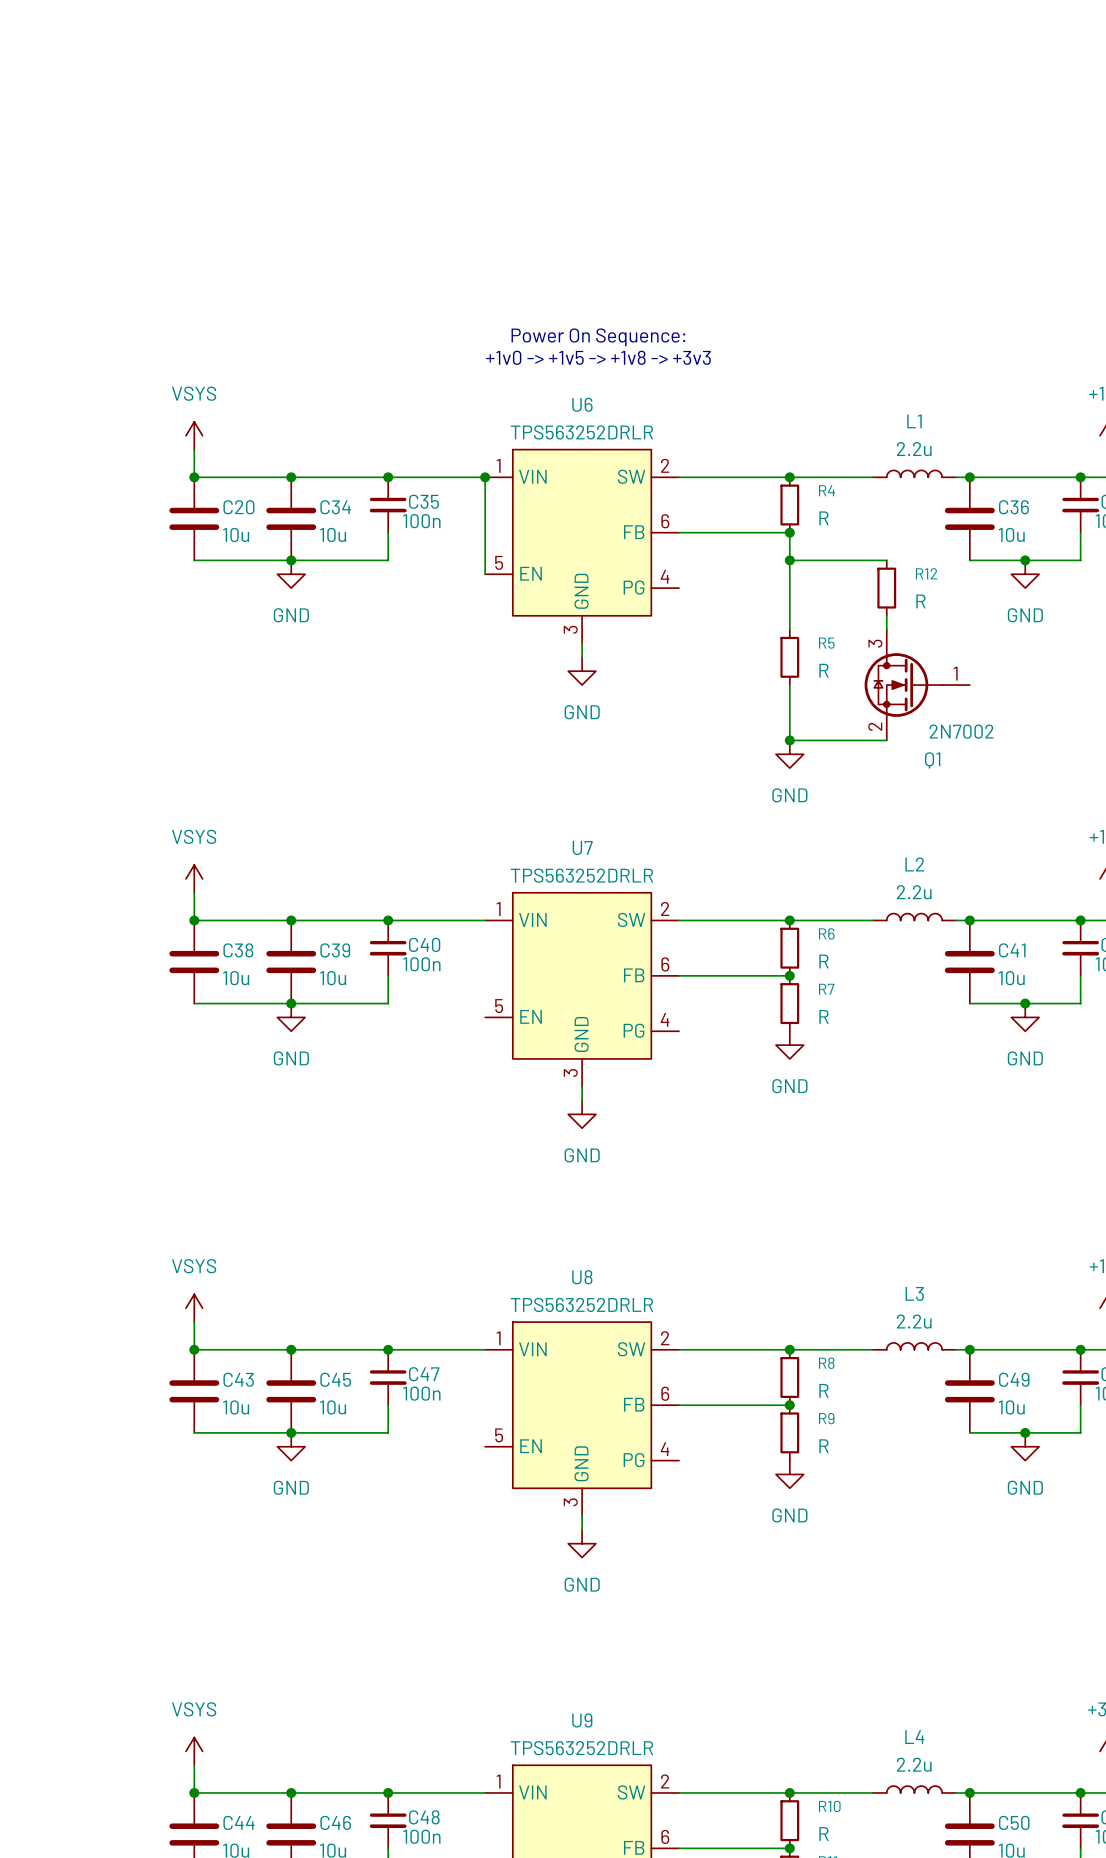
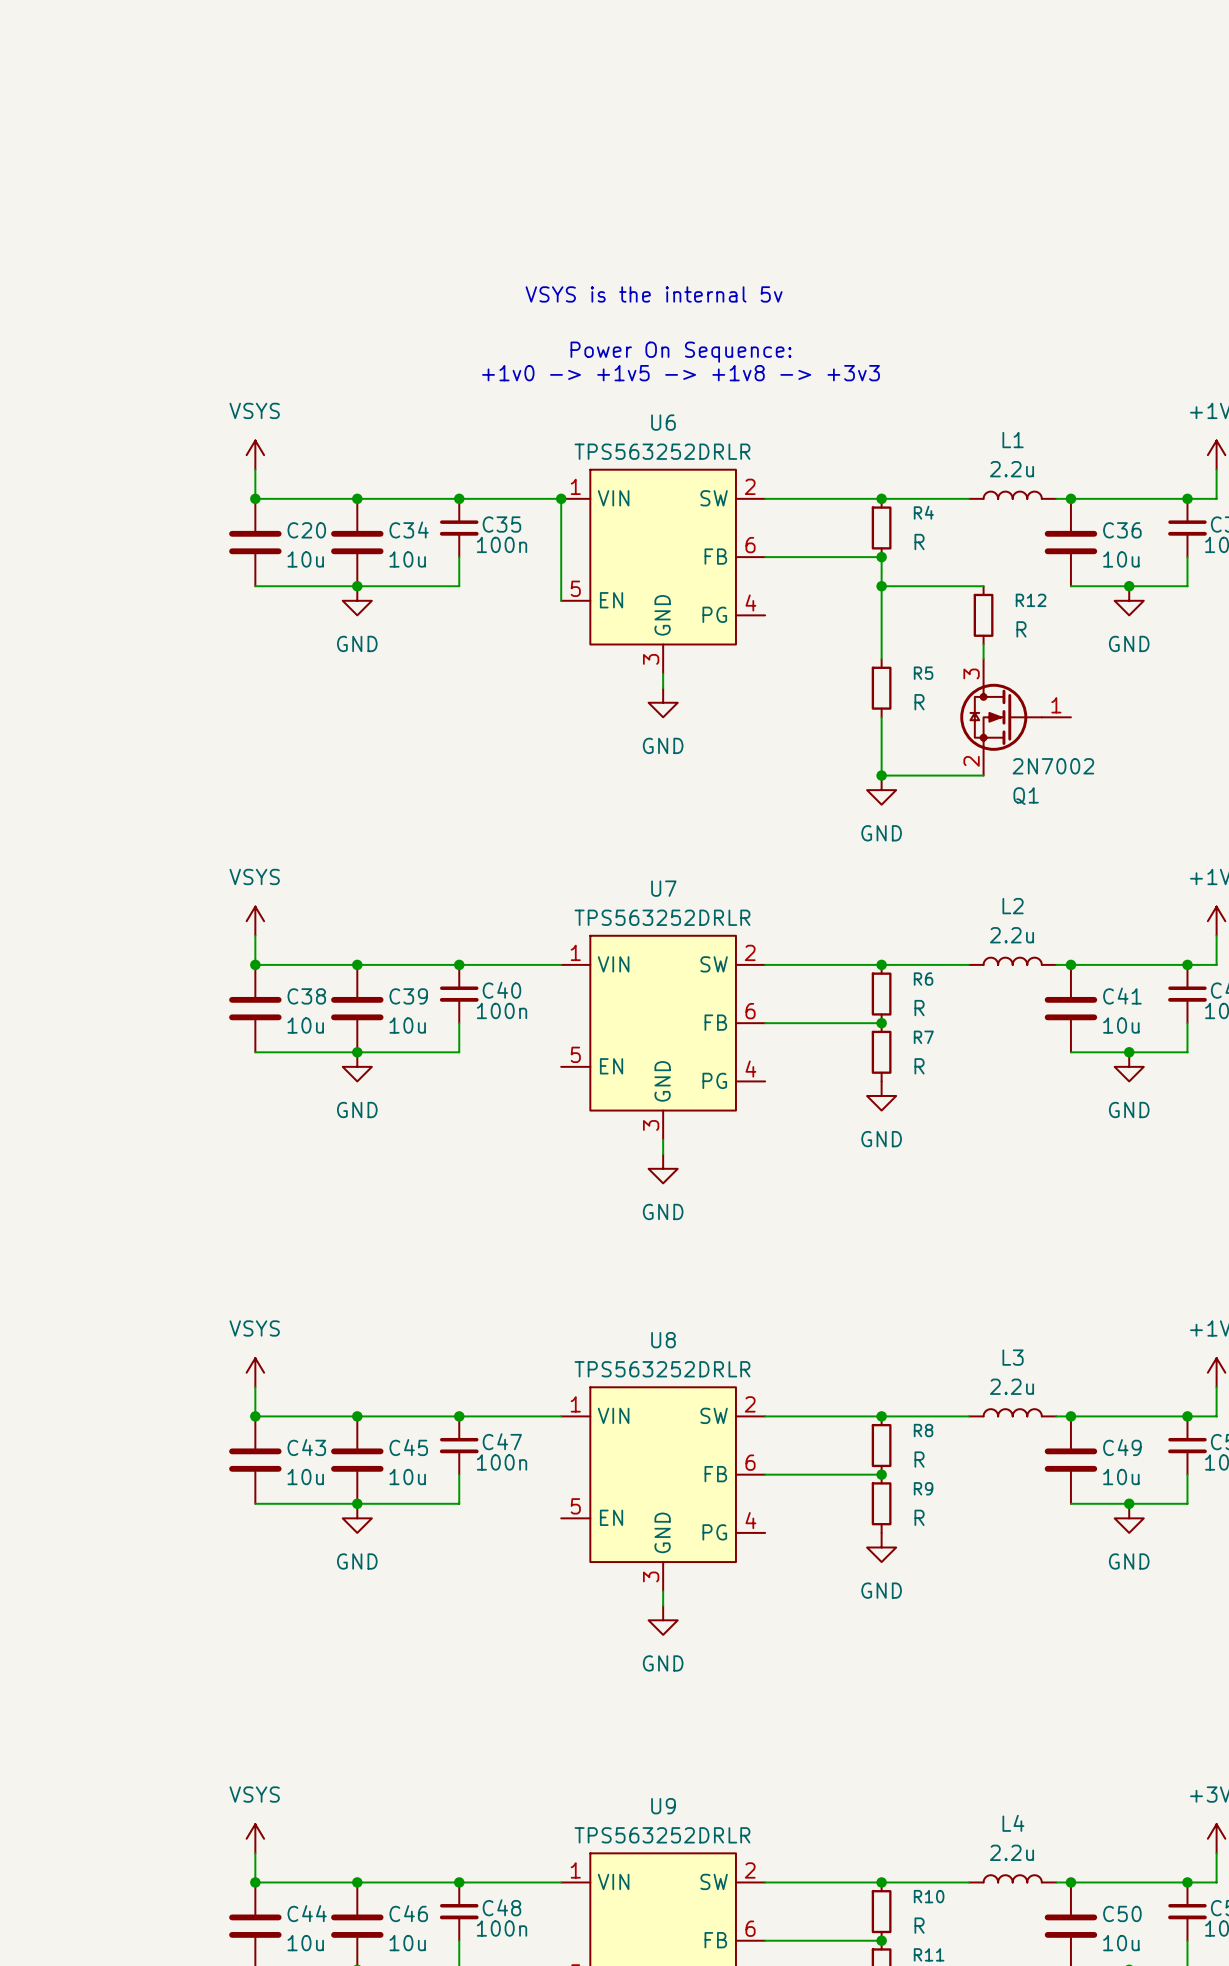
text: none -> VSYS is the internal 5v (654, 294)

